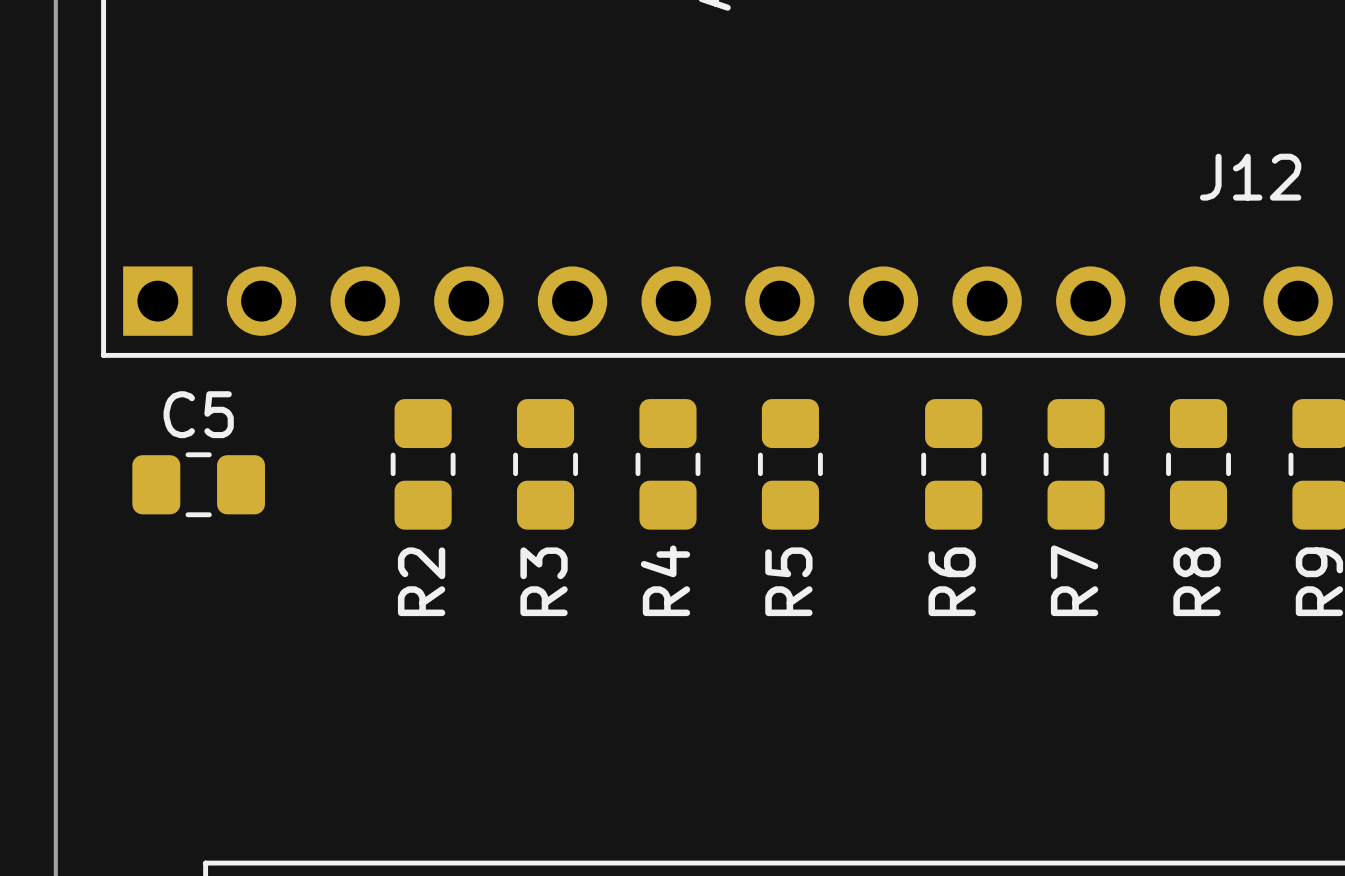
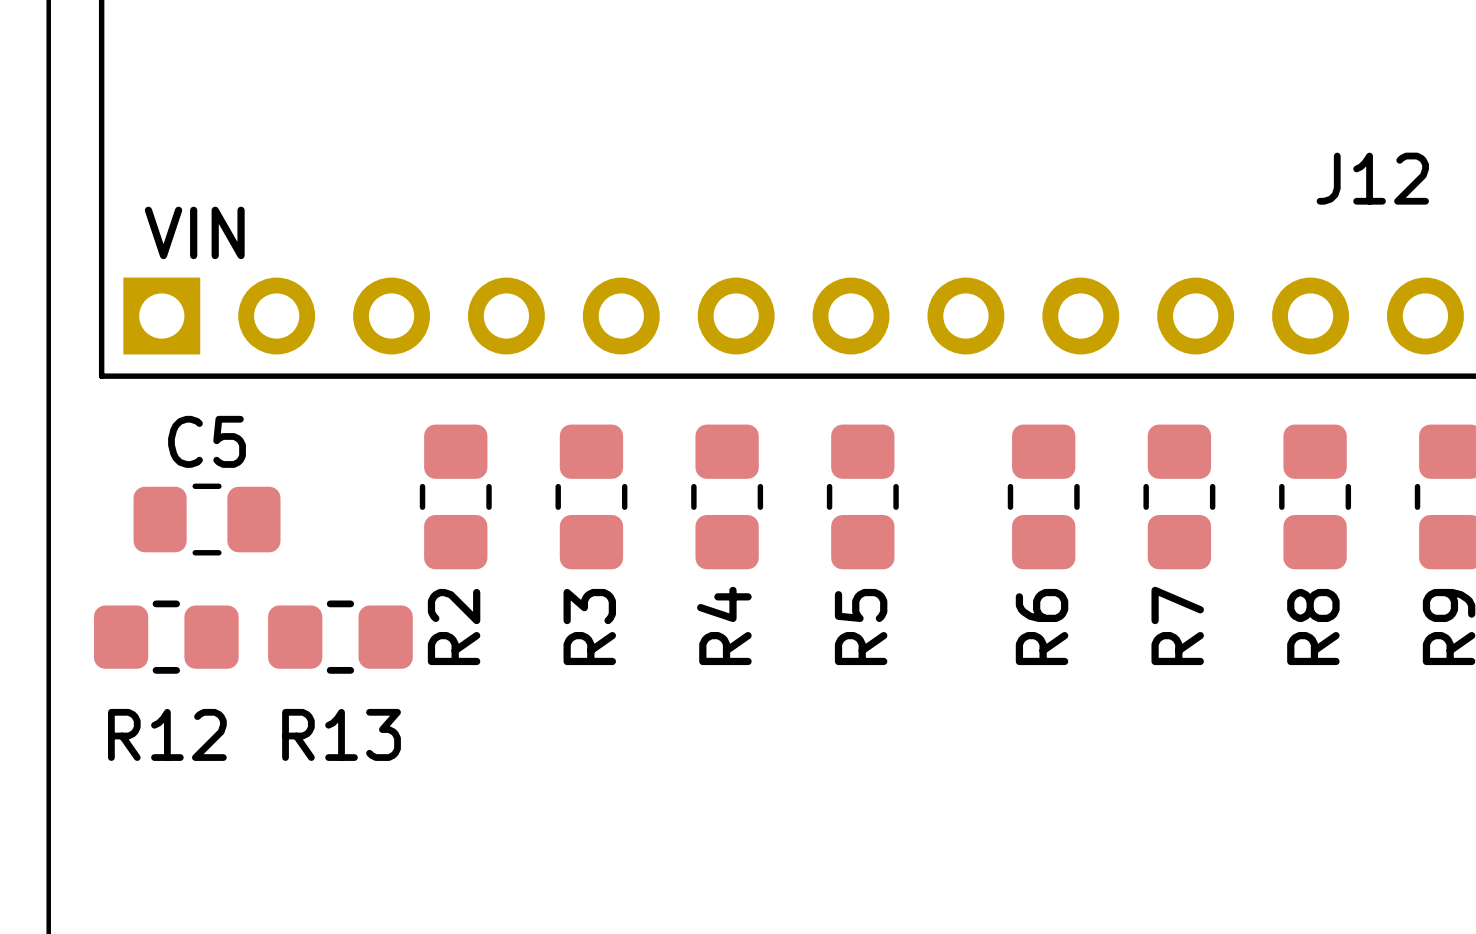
text: none -> VIN (194, 232)
R12: none -> (166, 637)
R13: none -> (340, 637)

